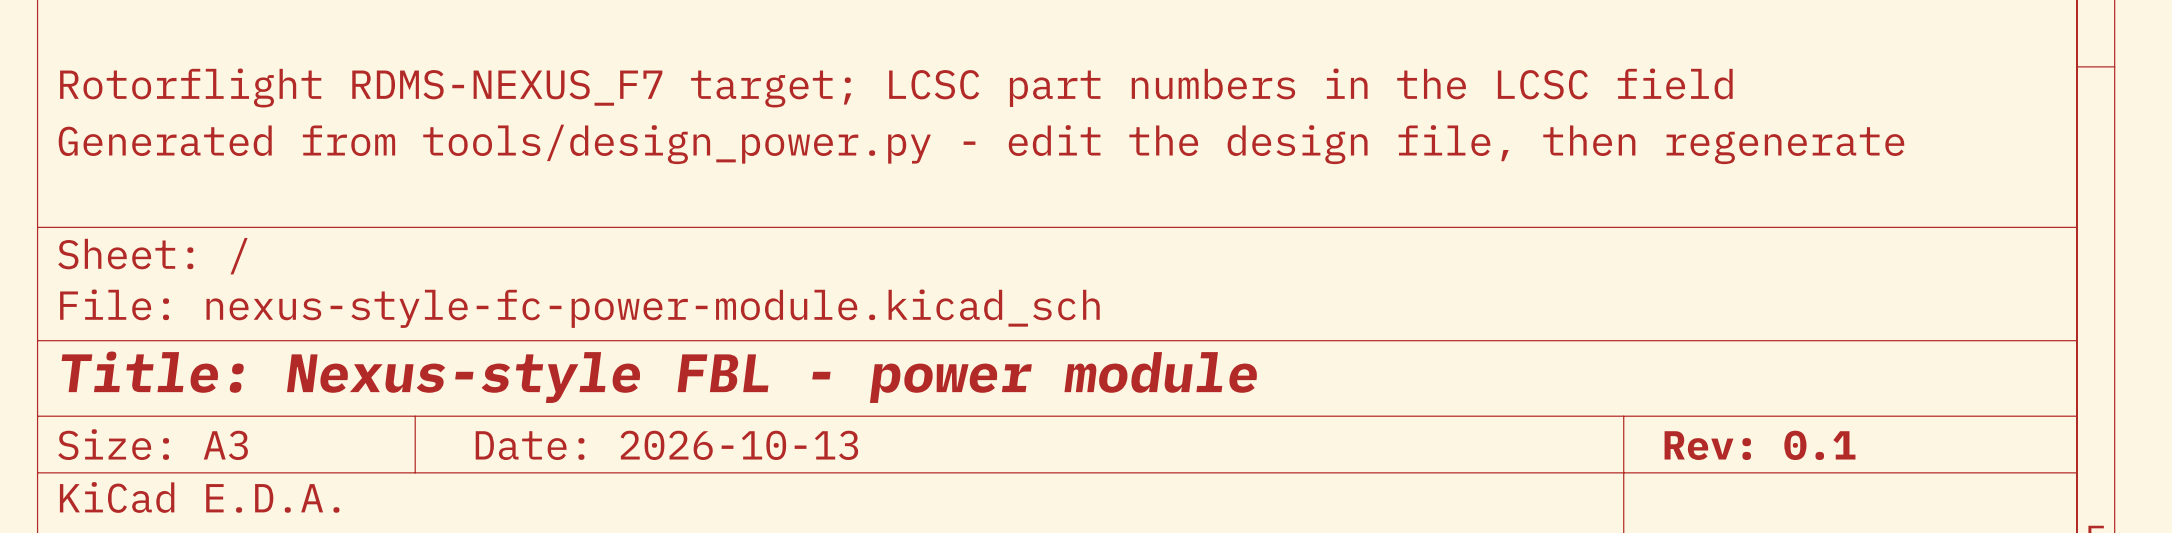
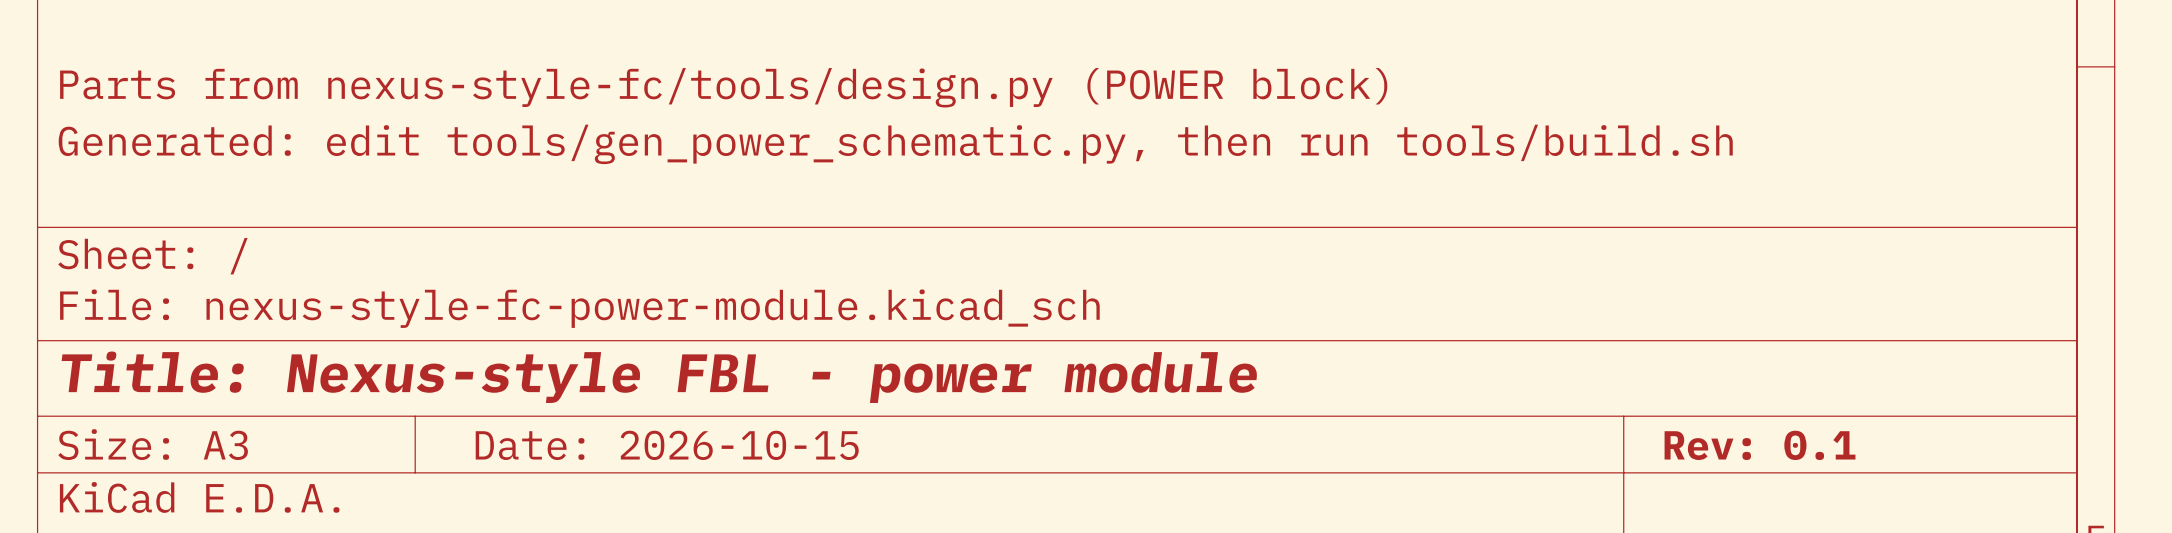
title block: Rotorflight RDMS-NEXUS_F7 target; LCSC part numbers in the LCSC field (896, 87) -> Parts from nexus-style-fc/tools/design.py (POWER block) (723, 87)
title block: Generated from tools/design_power.py - edit the design file, then regenerate (981, 144) -> Generated: edit tools/gen_power_schematic.py, then run tools/build.sh (895, 144)
title block: Date: 2026-10-13 (666, 445) -> Date: 2026-10-15 (667, 445)

